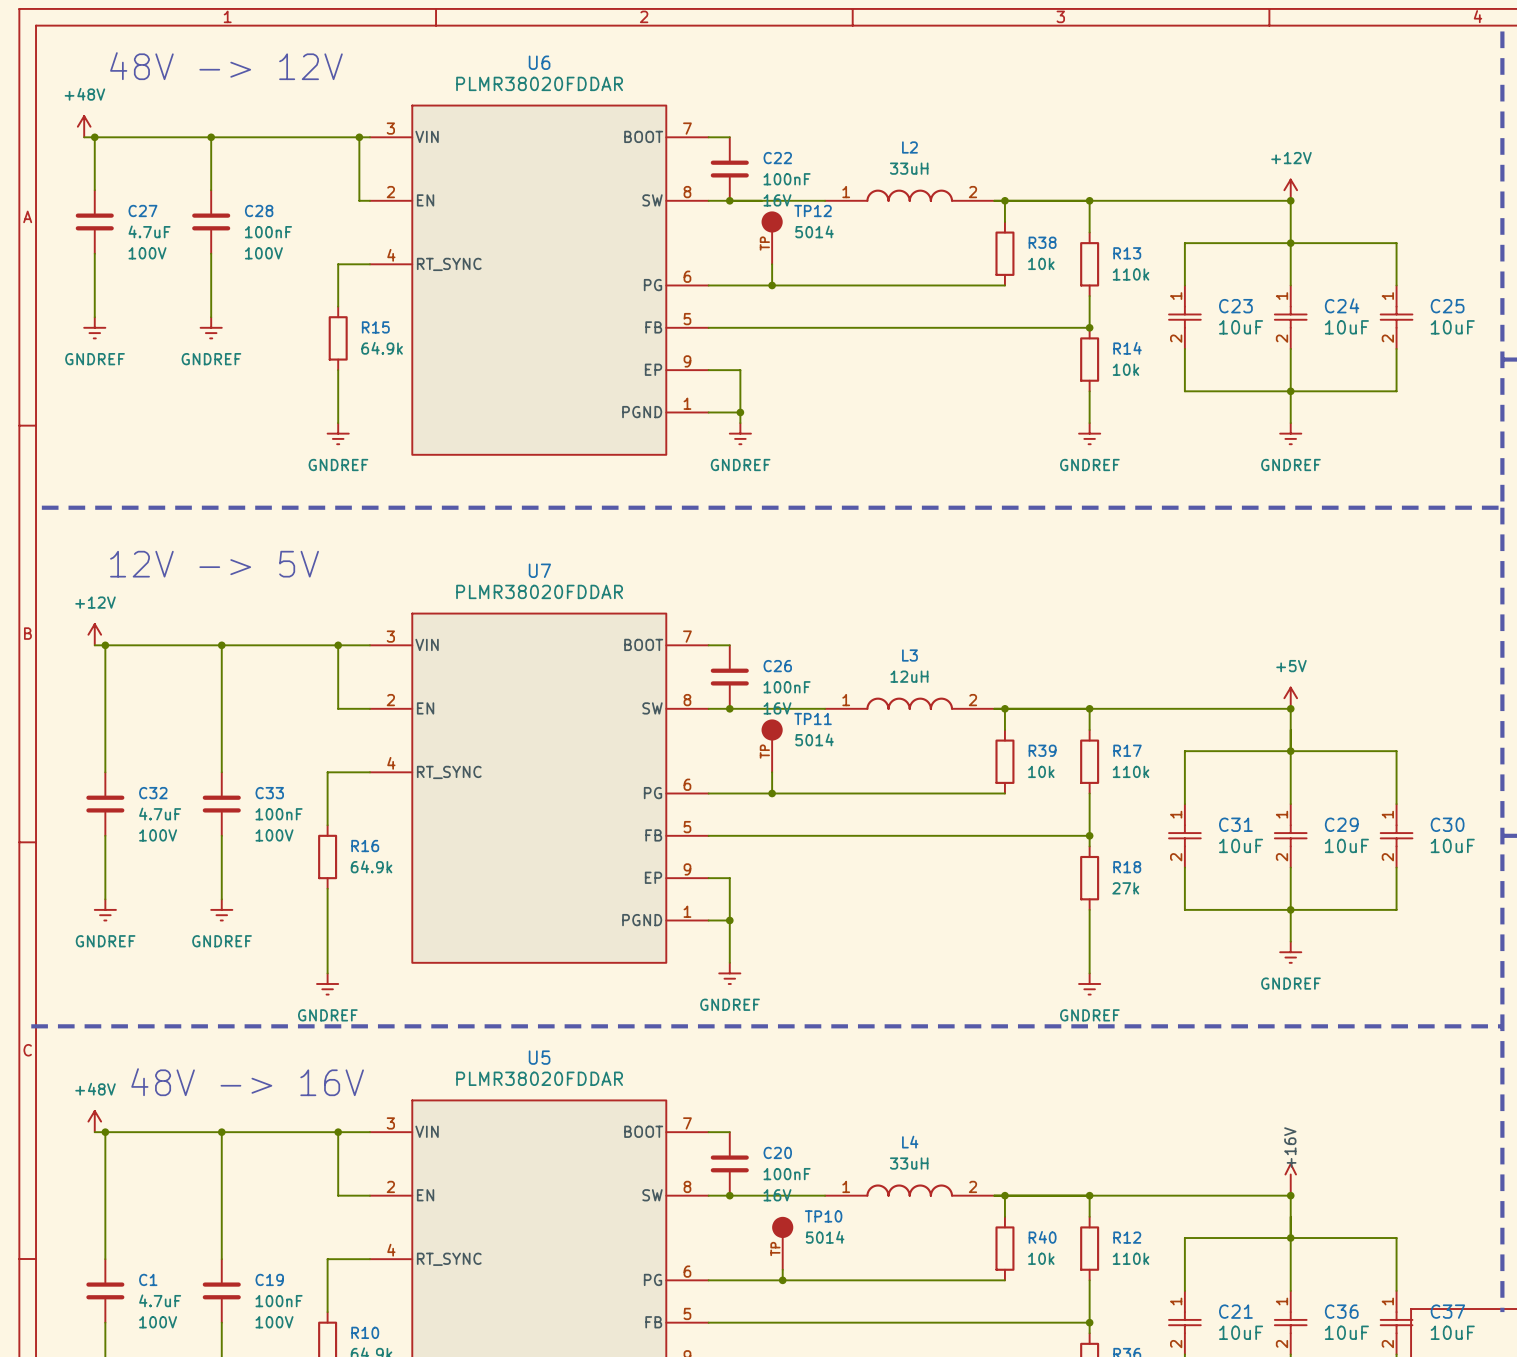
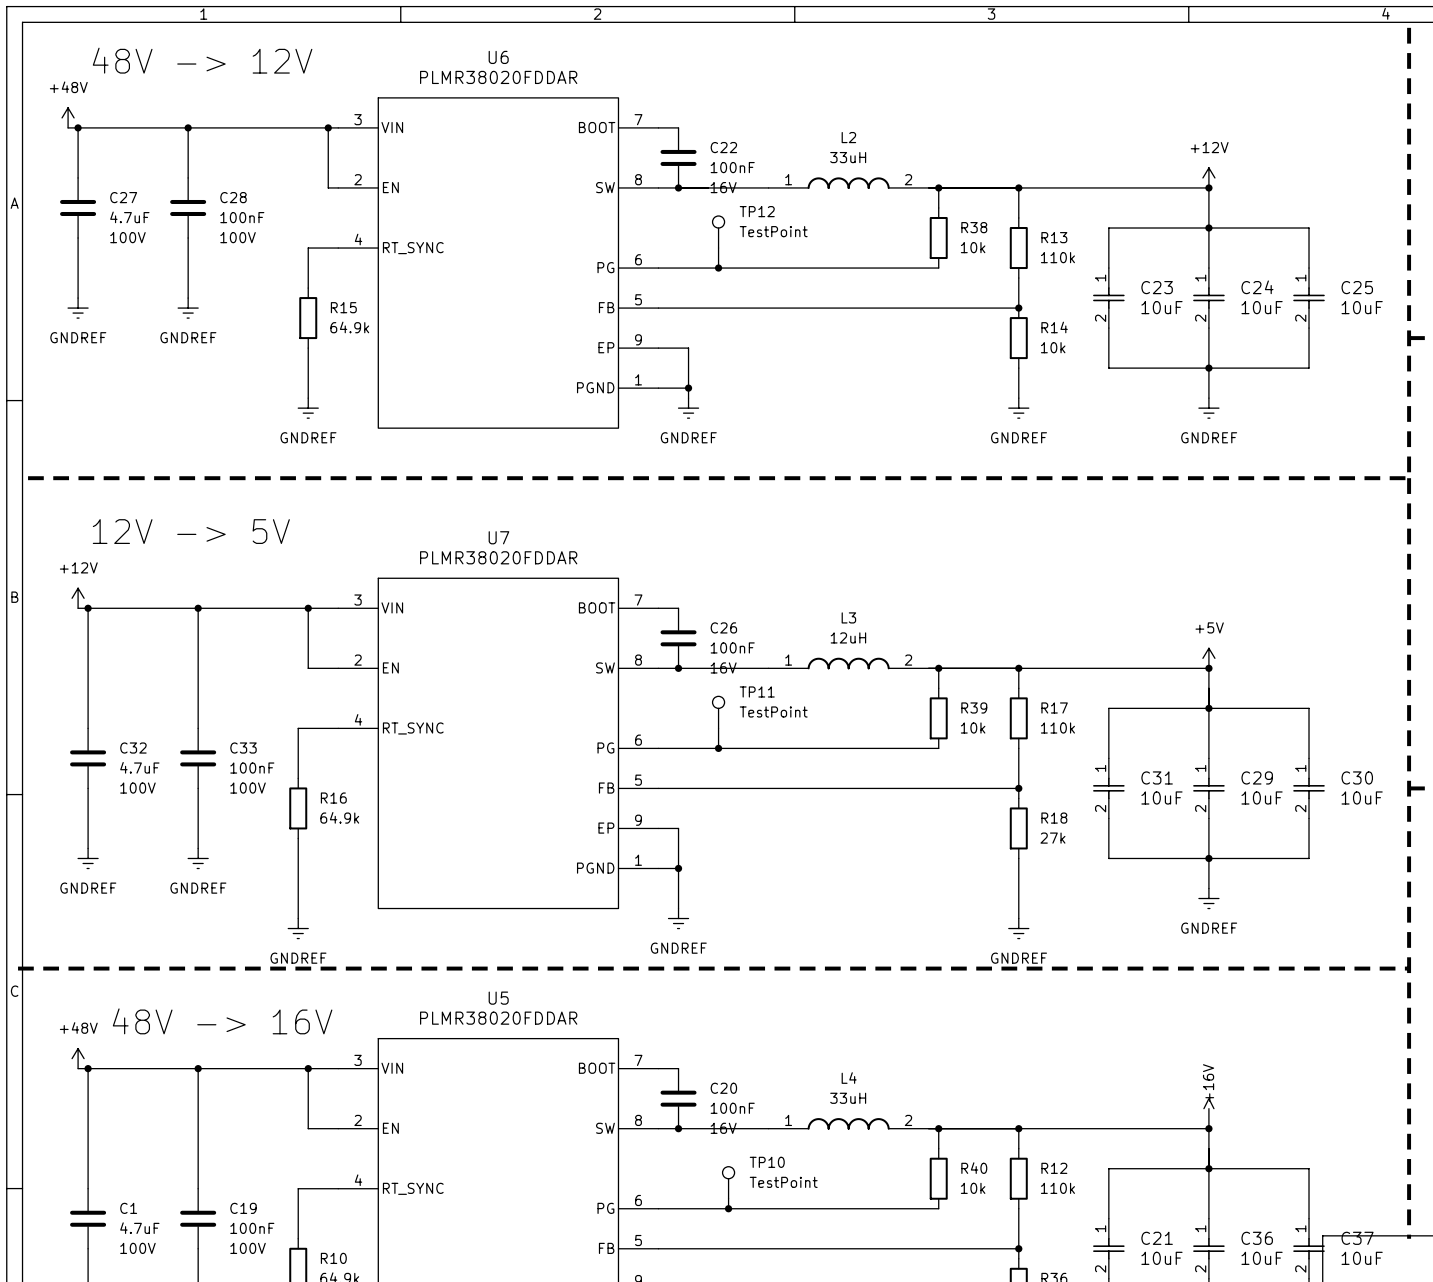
TP12 symbol: [761, 211, 783, 265] -> [712, 215, 725, 249]
TP12 value: 5014 (814, 231) -> TestPoint (773, 231)
TP11 symbol: [761, 719, 783, 773] -> [712, 696, 725, 729]
TP11 value: 5014 (814, 739) -> TestPoint (773, 711)
TP10 symbol: [772, 1216, 794, 1270] -> [722, 1166, 735, 1199]
TP10 value: 5014 (825, 1237) -> TestPoint (783, 1182)

